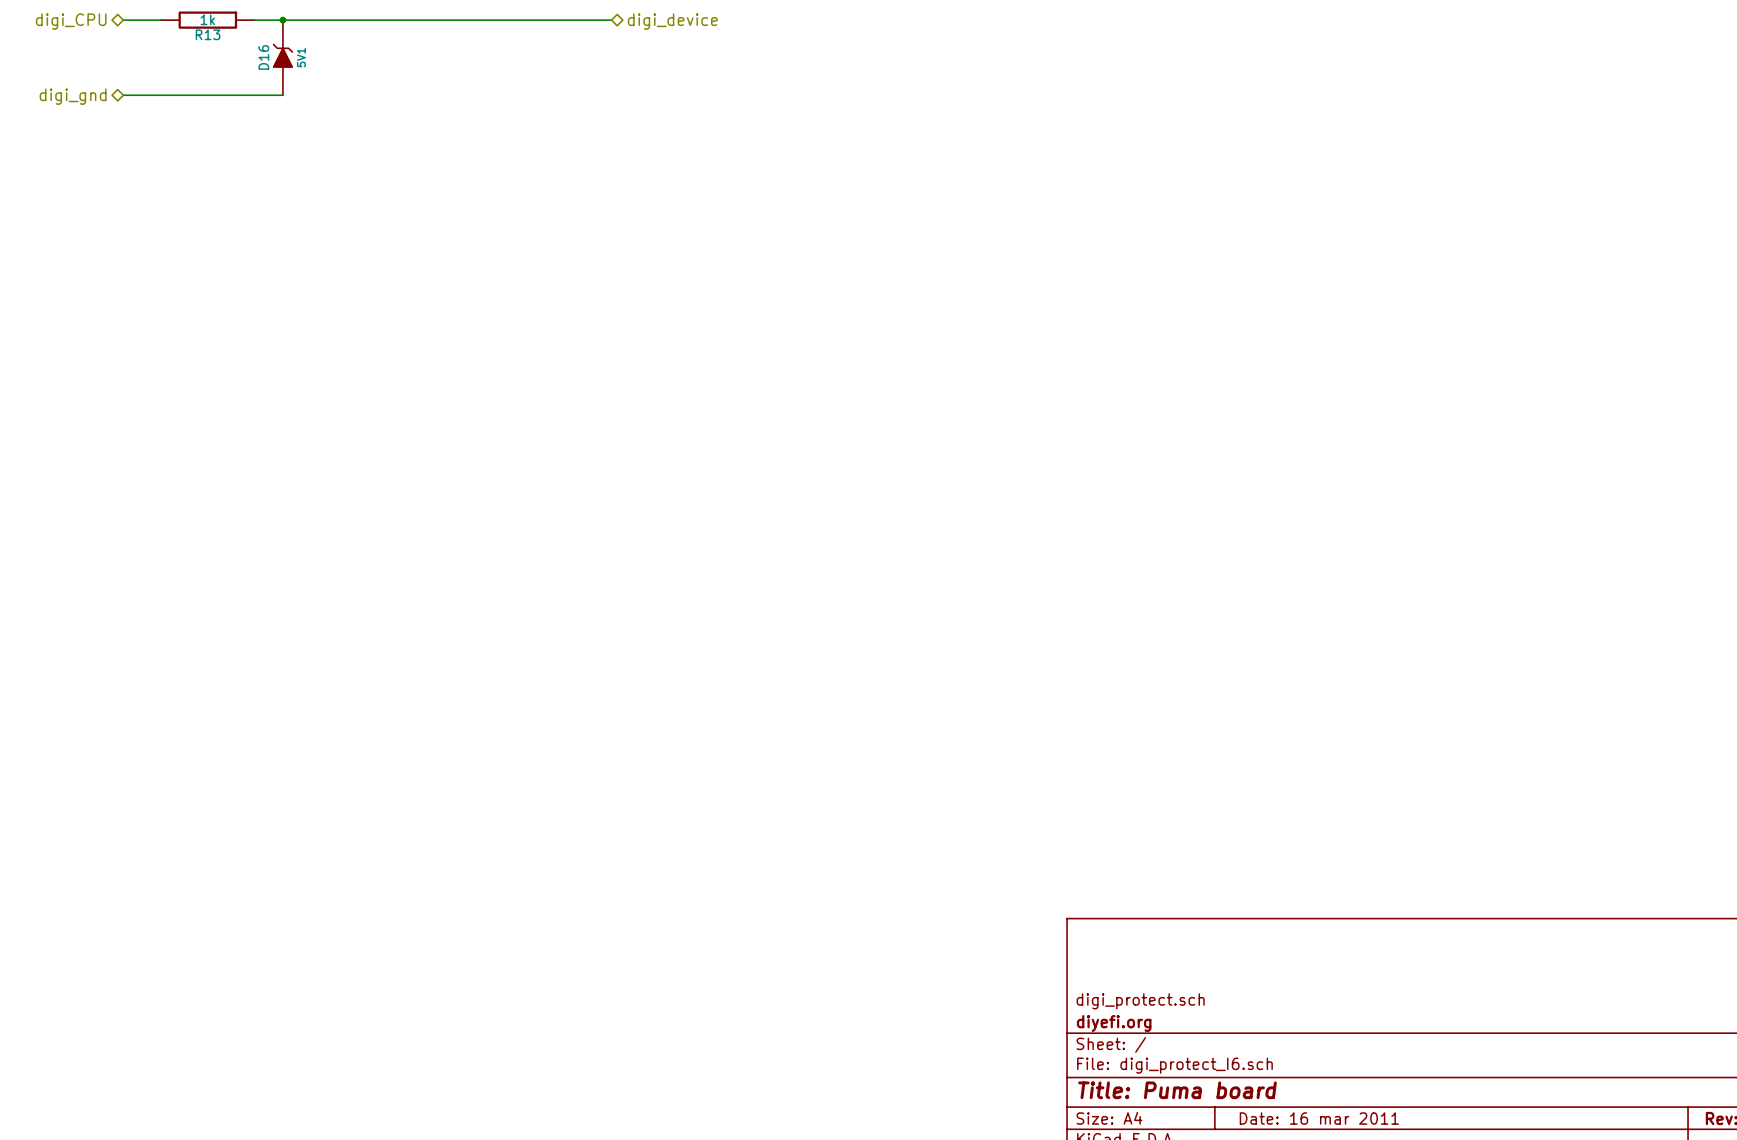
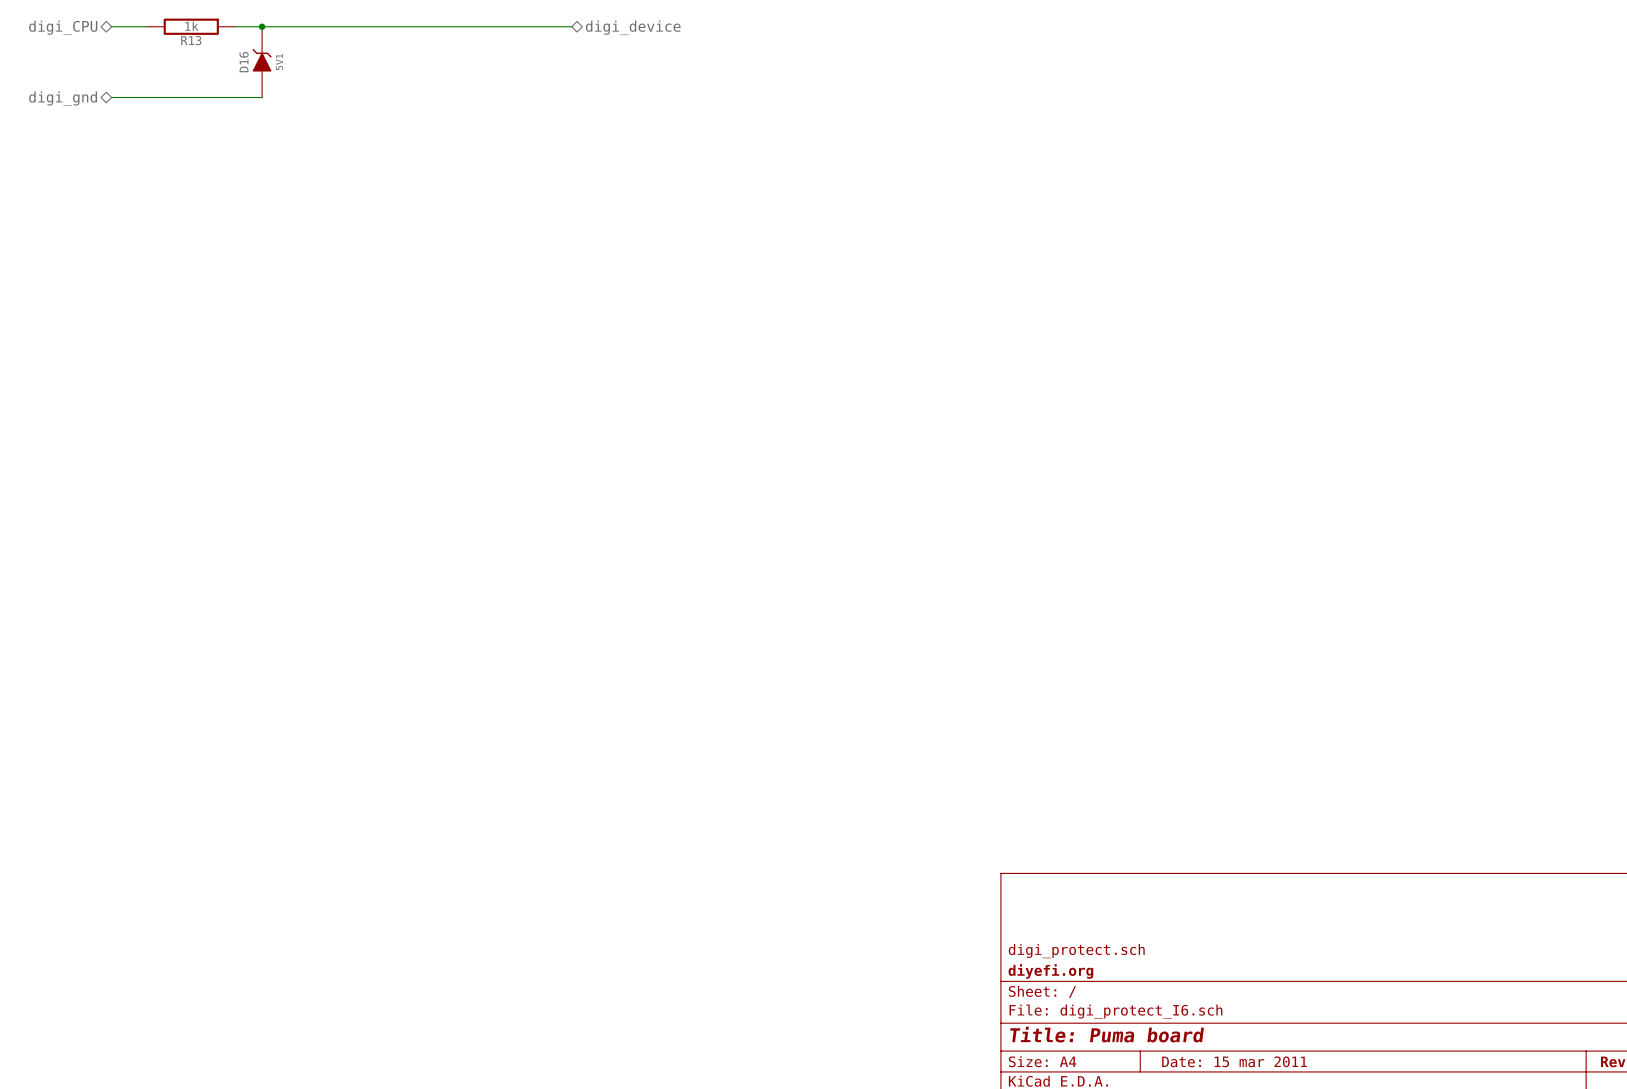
title block: Date: 16 mar 2011 (1319, 1118) -> Date: 15 mar 2011 (1234, 1061)

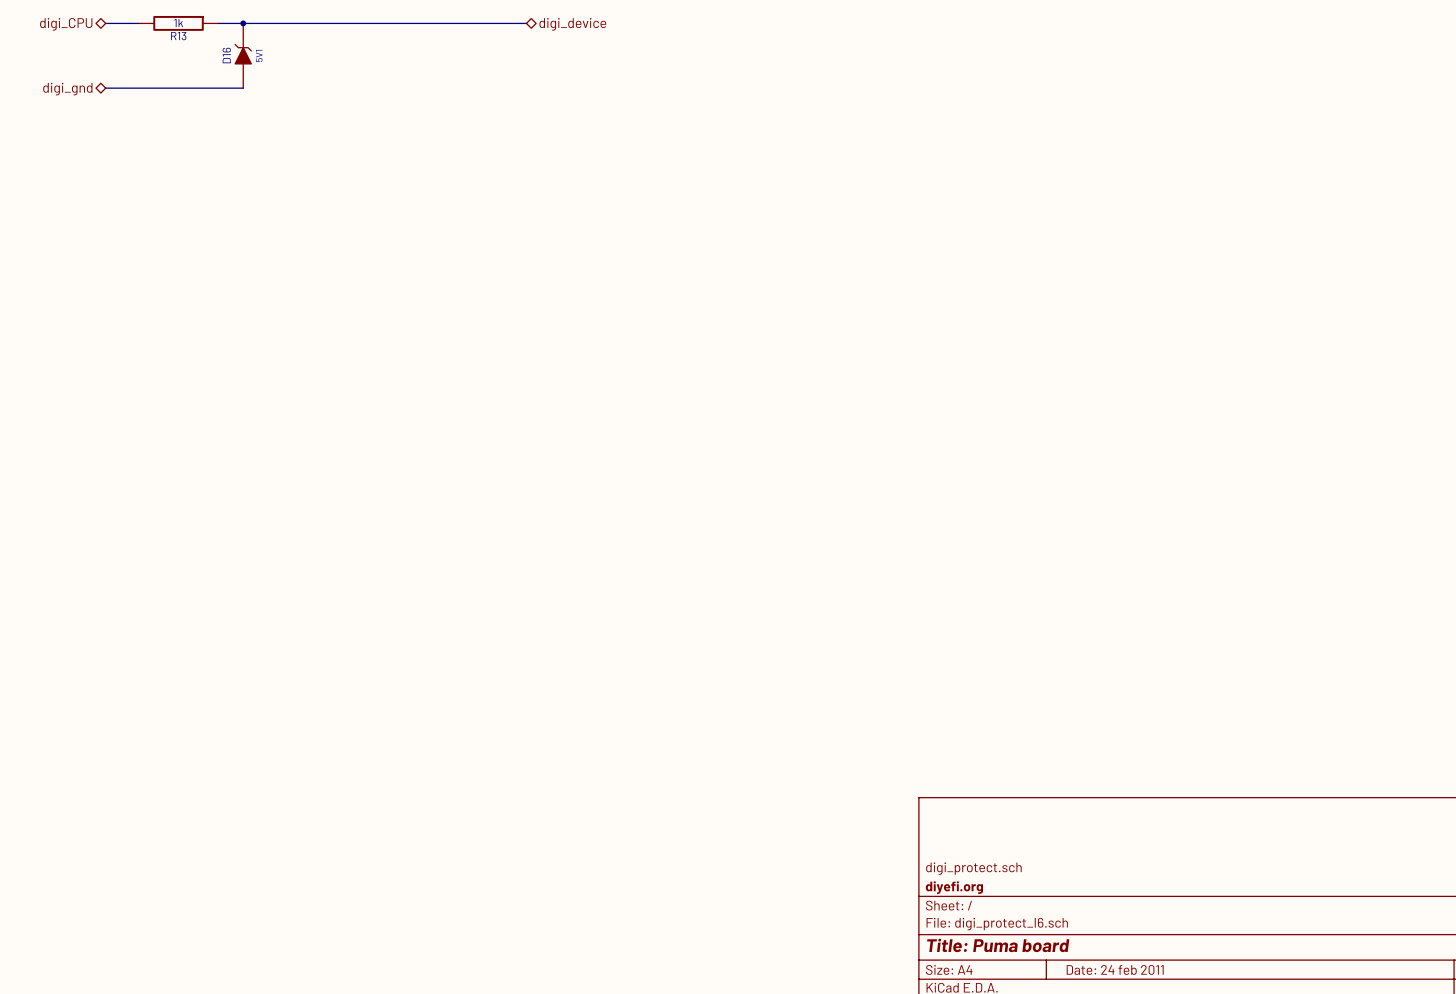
title block: Date: 15 mar 2011 (1234, 1061) -> Date: 24 feb 2011 (1115, 969)

